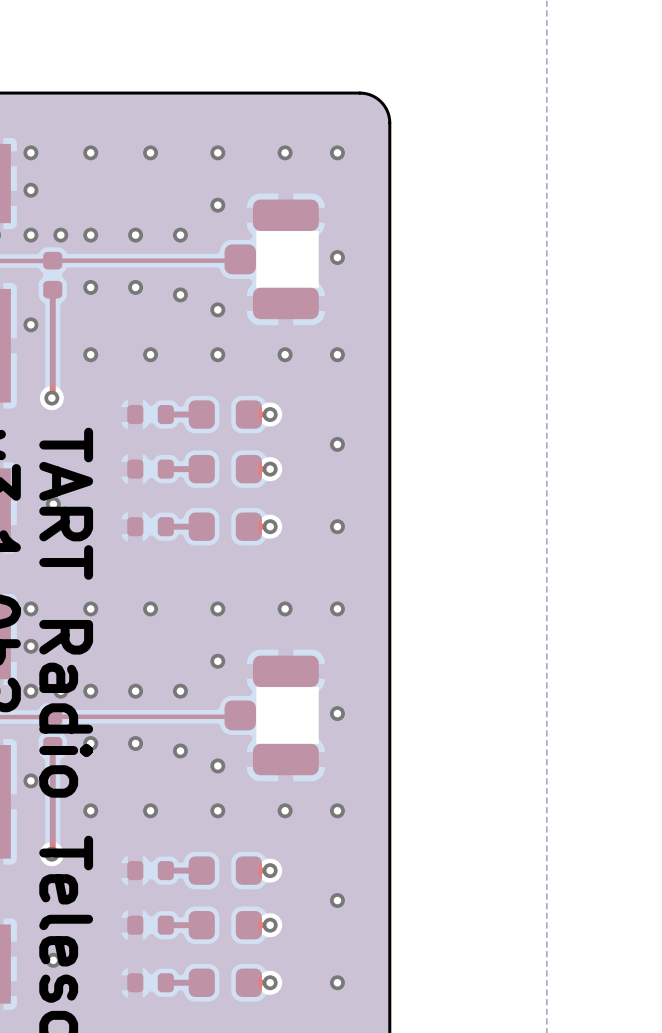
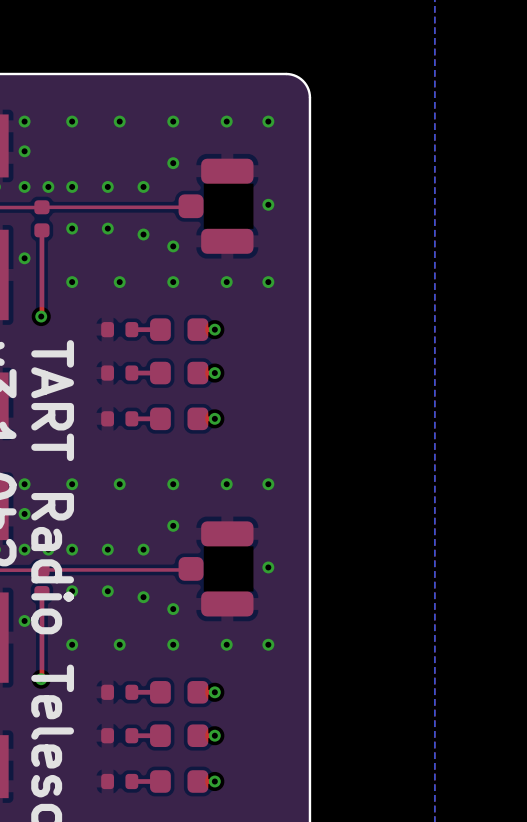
via: (337, 444) -> none
via: (53, 504) -> none
via: (337, 526) -> none
via: (337, 900) -> none
via: (53, 960) -> none
via: (337, 982) -> none

